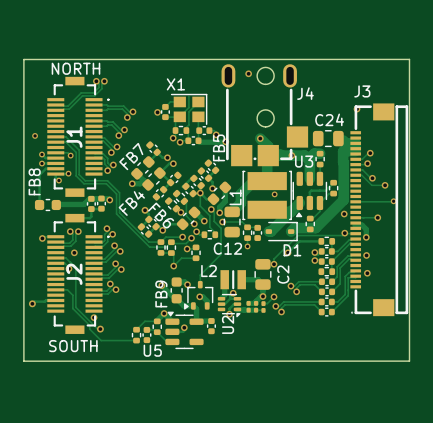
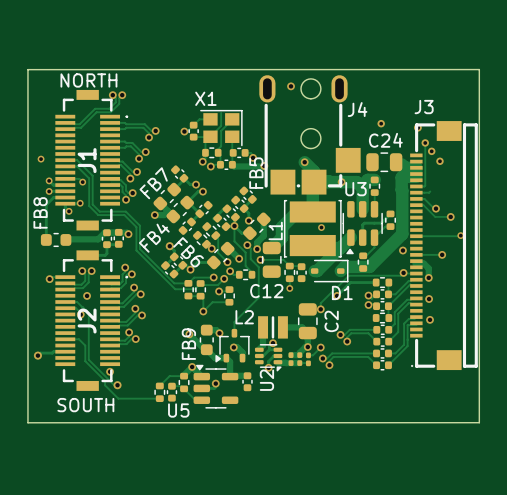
via: none -> (381, 123)
via: none -> (425, 142)
via: none -> (431, 151)
via: none -> (439, 161)
track: (370, 153) (362, 159) -> (425, 142) (424, 186)
via: (370, 153) -> none
via: (367, 163) -> none

